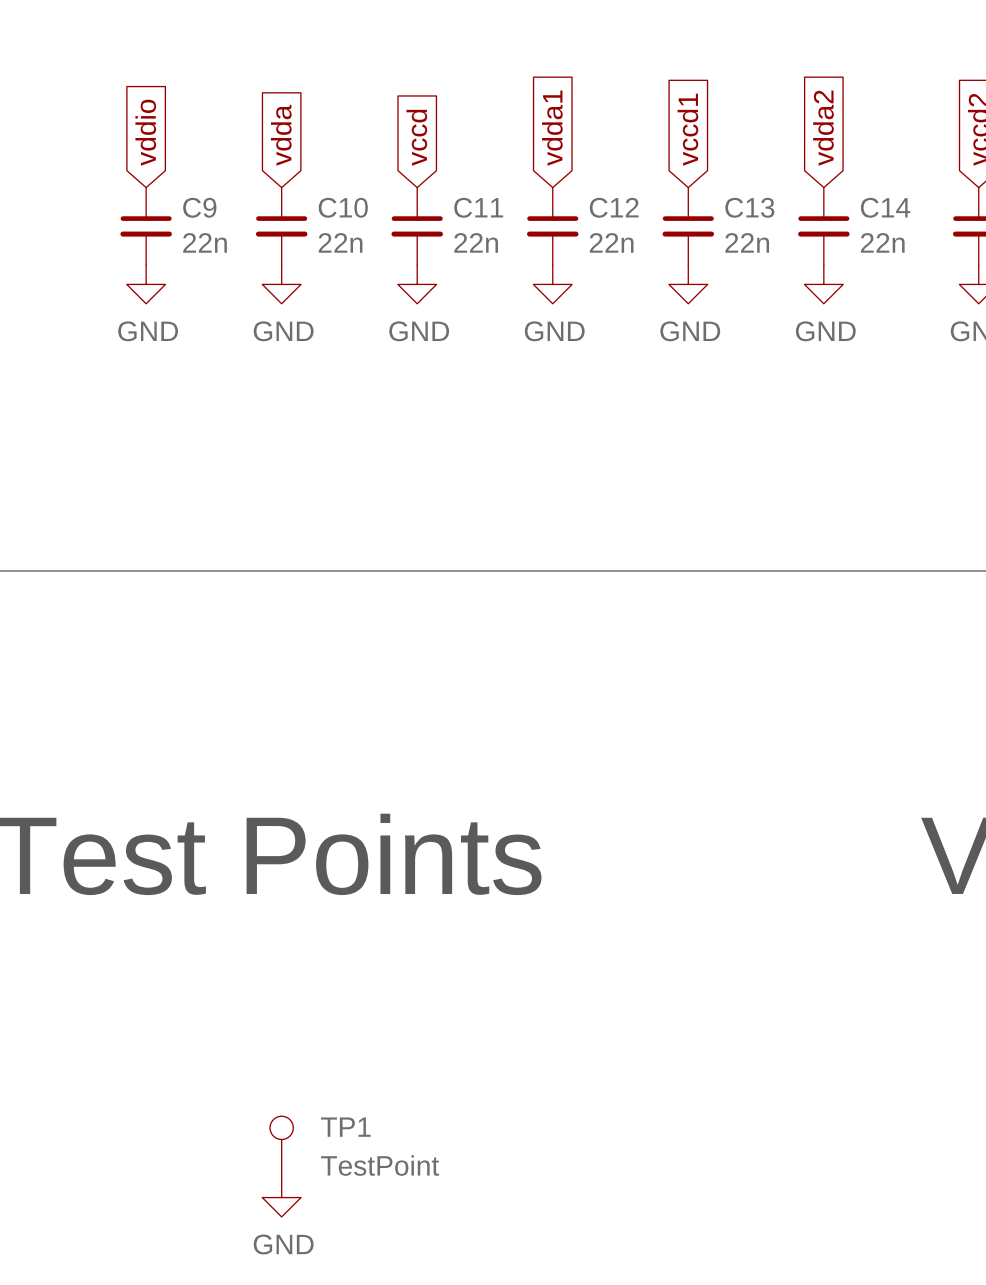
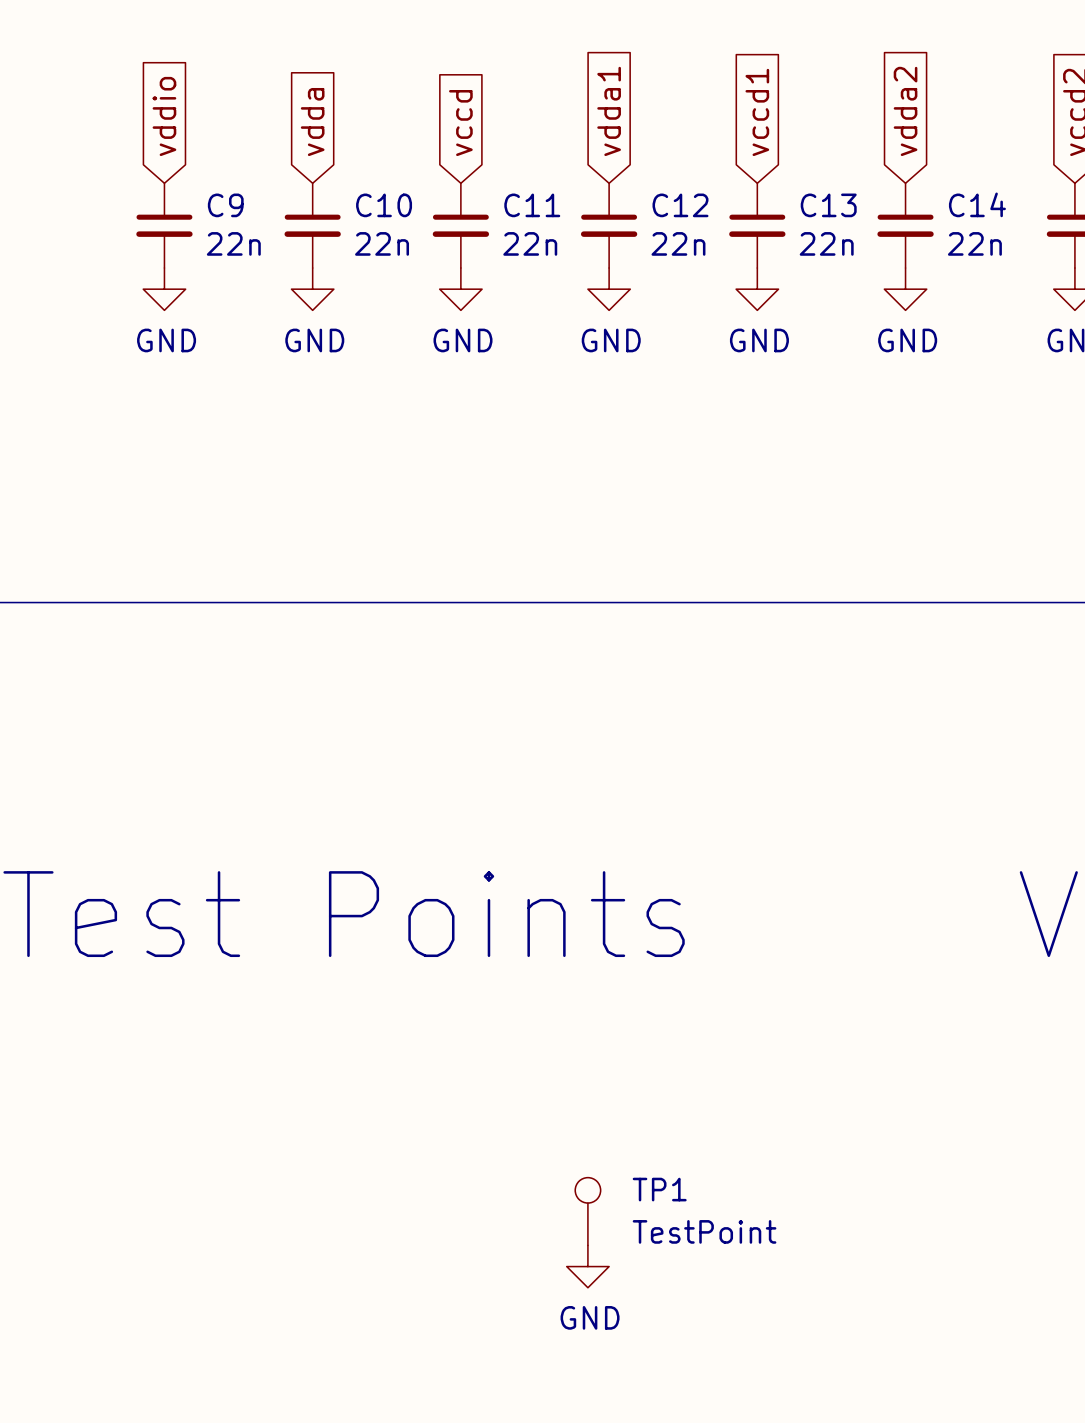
TP1 position: (281, 1147) -> (587, 1211)
power symbol position: GND (281, 1197) -> GND (587, 1266)

